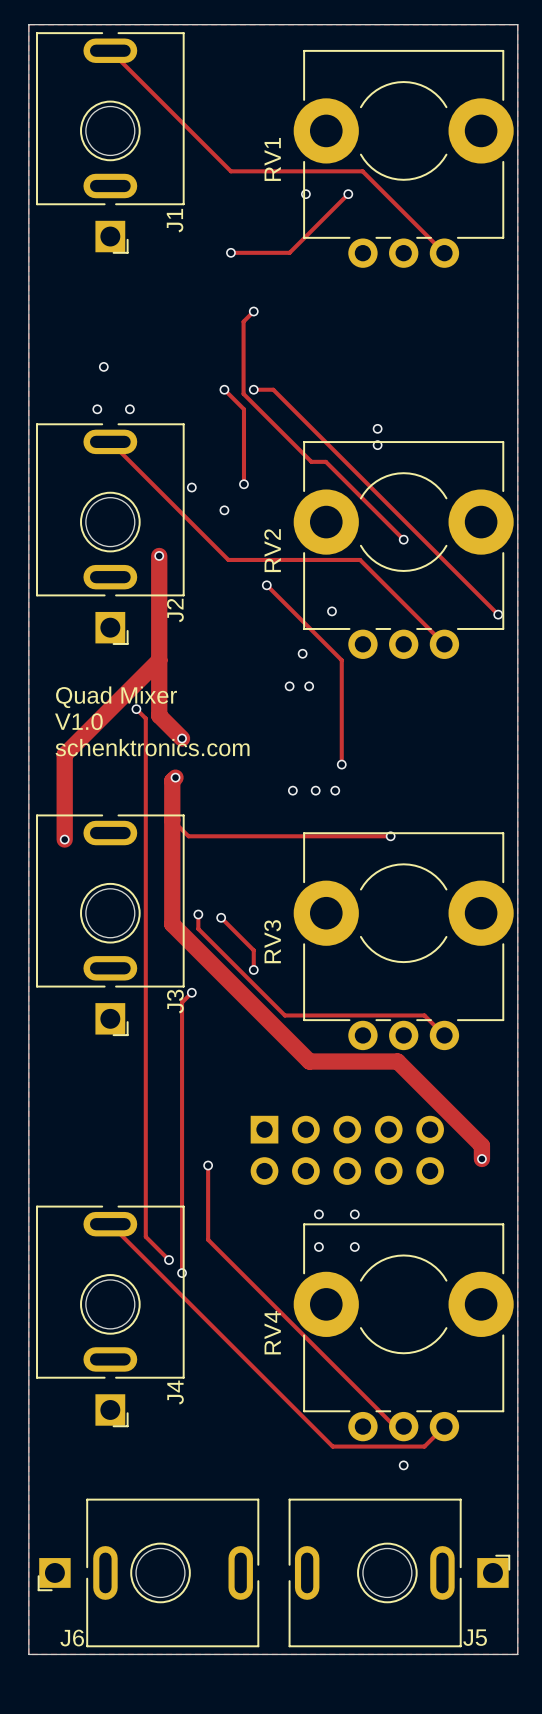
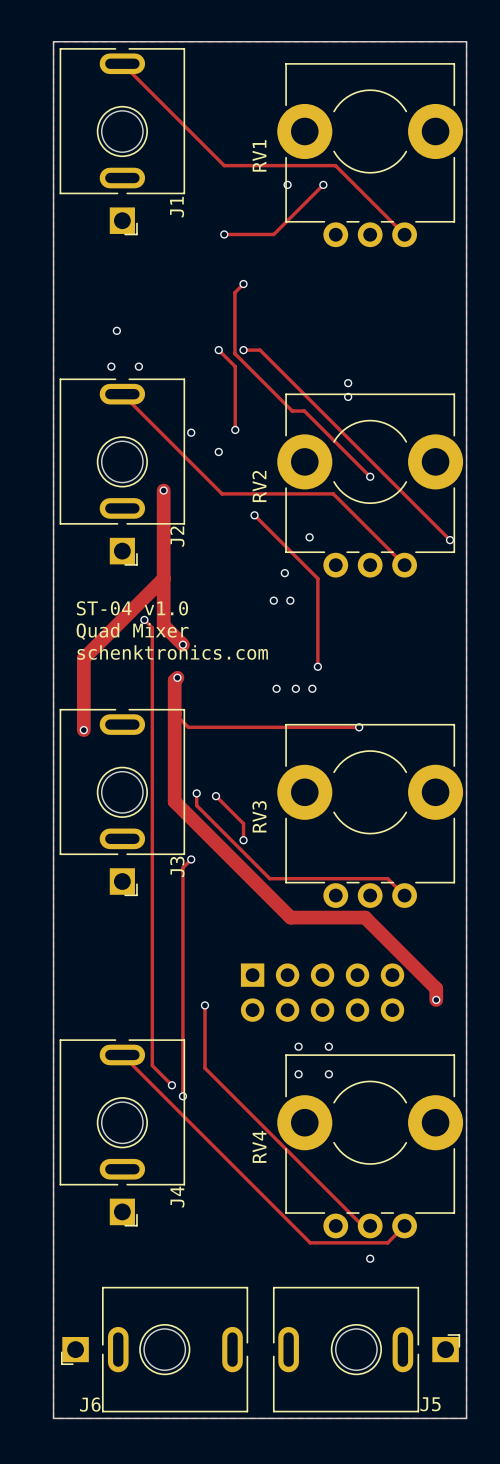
text: Quad Mixer (116, 697) -> ST-04 v1.0 (132, 608)
text: V1.0 (78, 721) -> Quad Mixer (132, 631)

